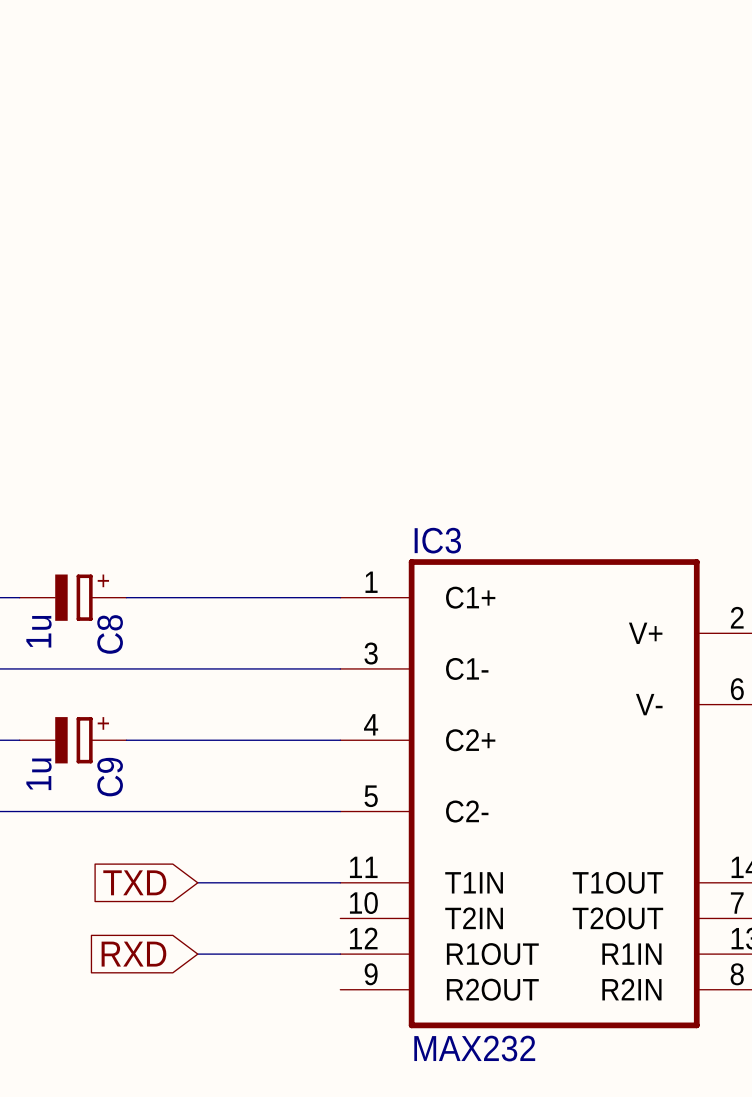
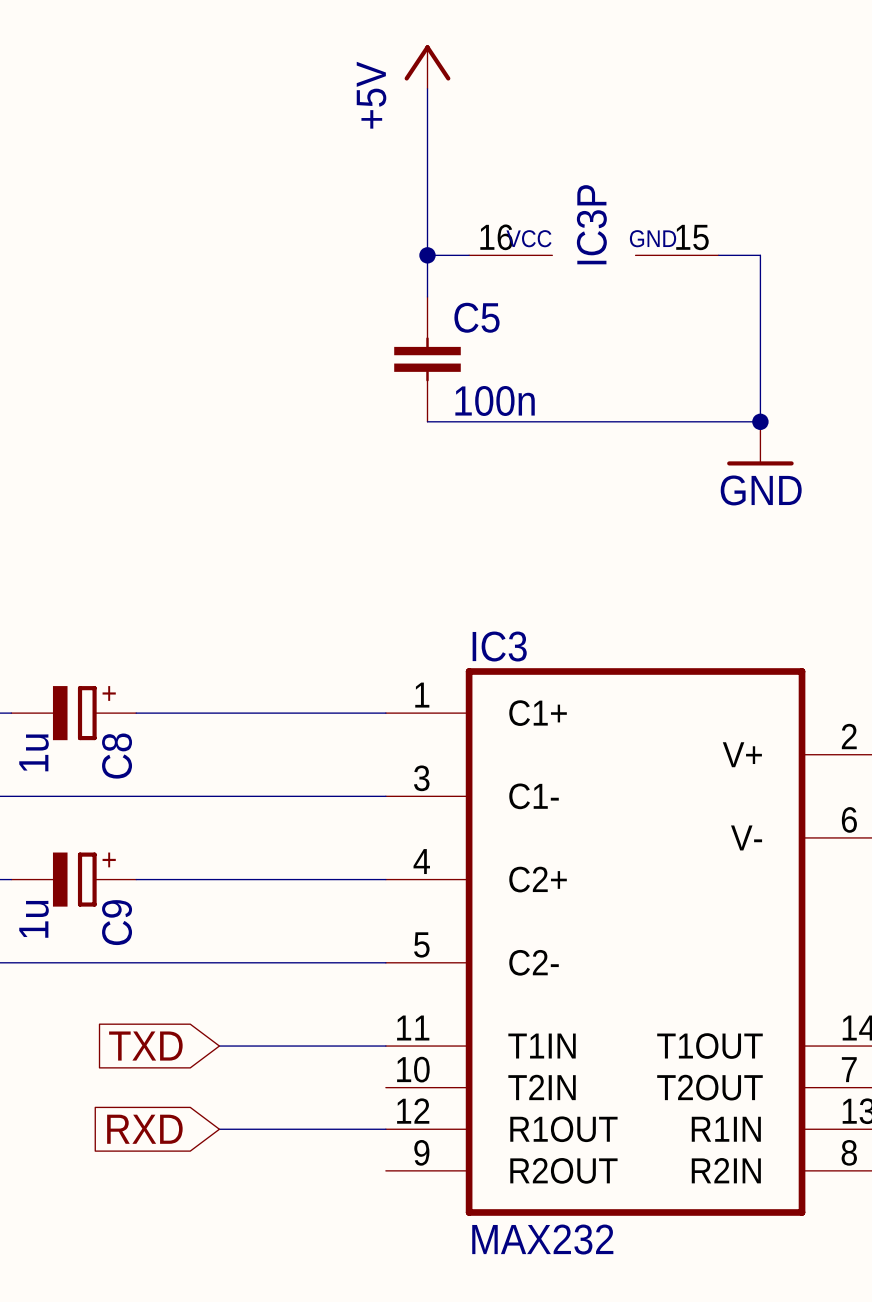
power symbol: none -> +5V (427, 67)
wire: none -> (427, 88) (427, 296)
wire: none -> (427, 255) (469, 255)
junction: none -> (427, 255)
IC3P: none -> (593, 255)
wire: none -> (718, 255) (760, 255) (760, 421) (427, 421)
C5: none -> 100n (427, 359)
junction: none -> (760, 421)
power symbol: none -> GND (760, 443)

